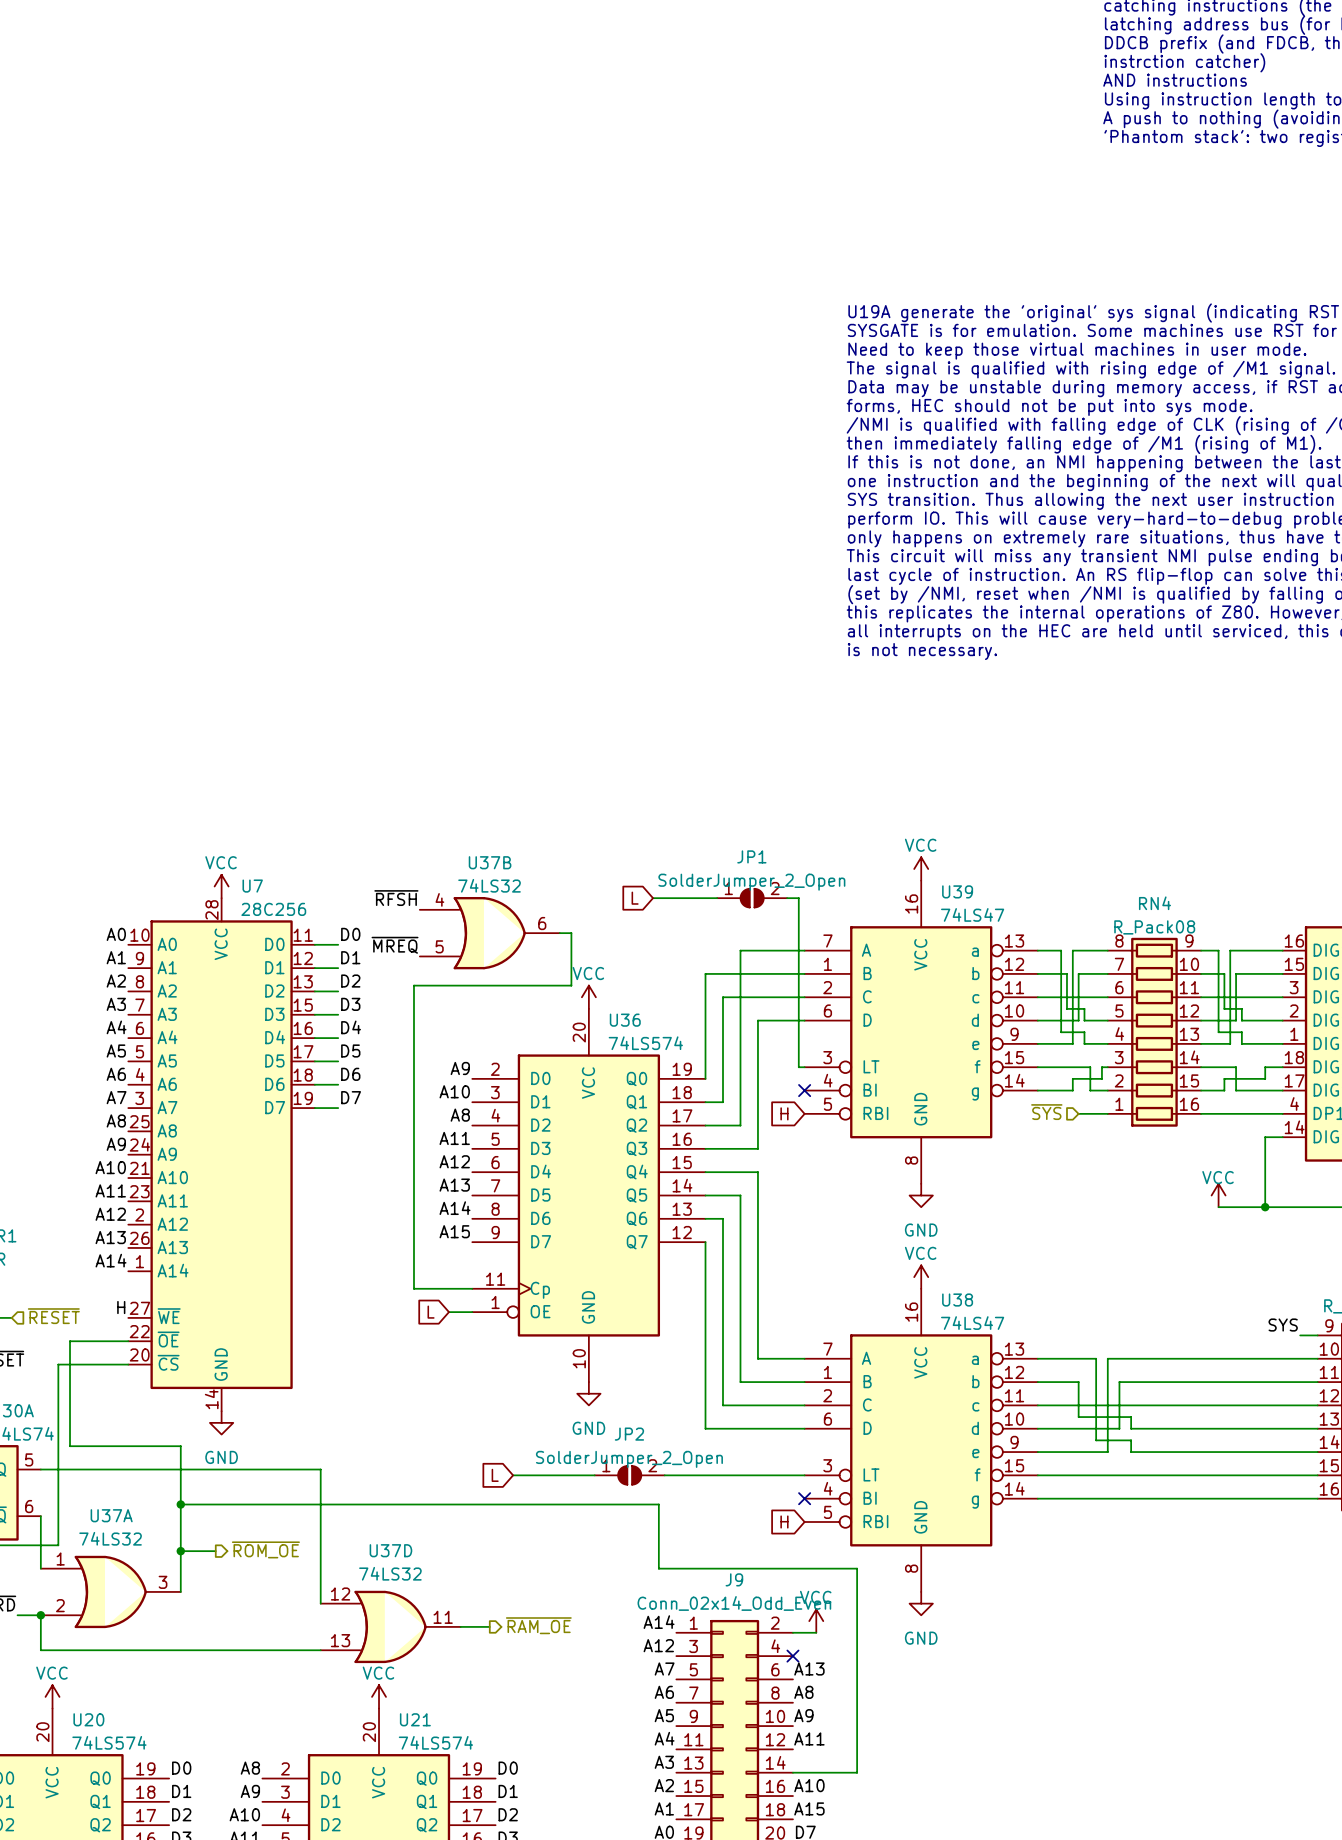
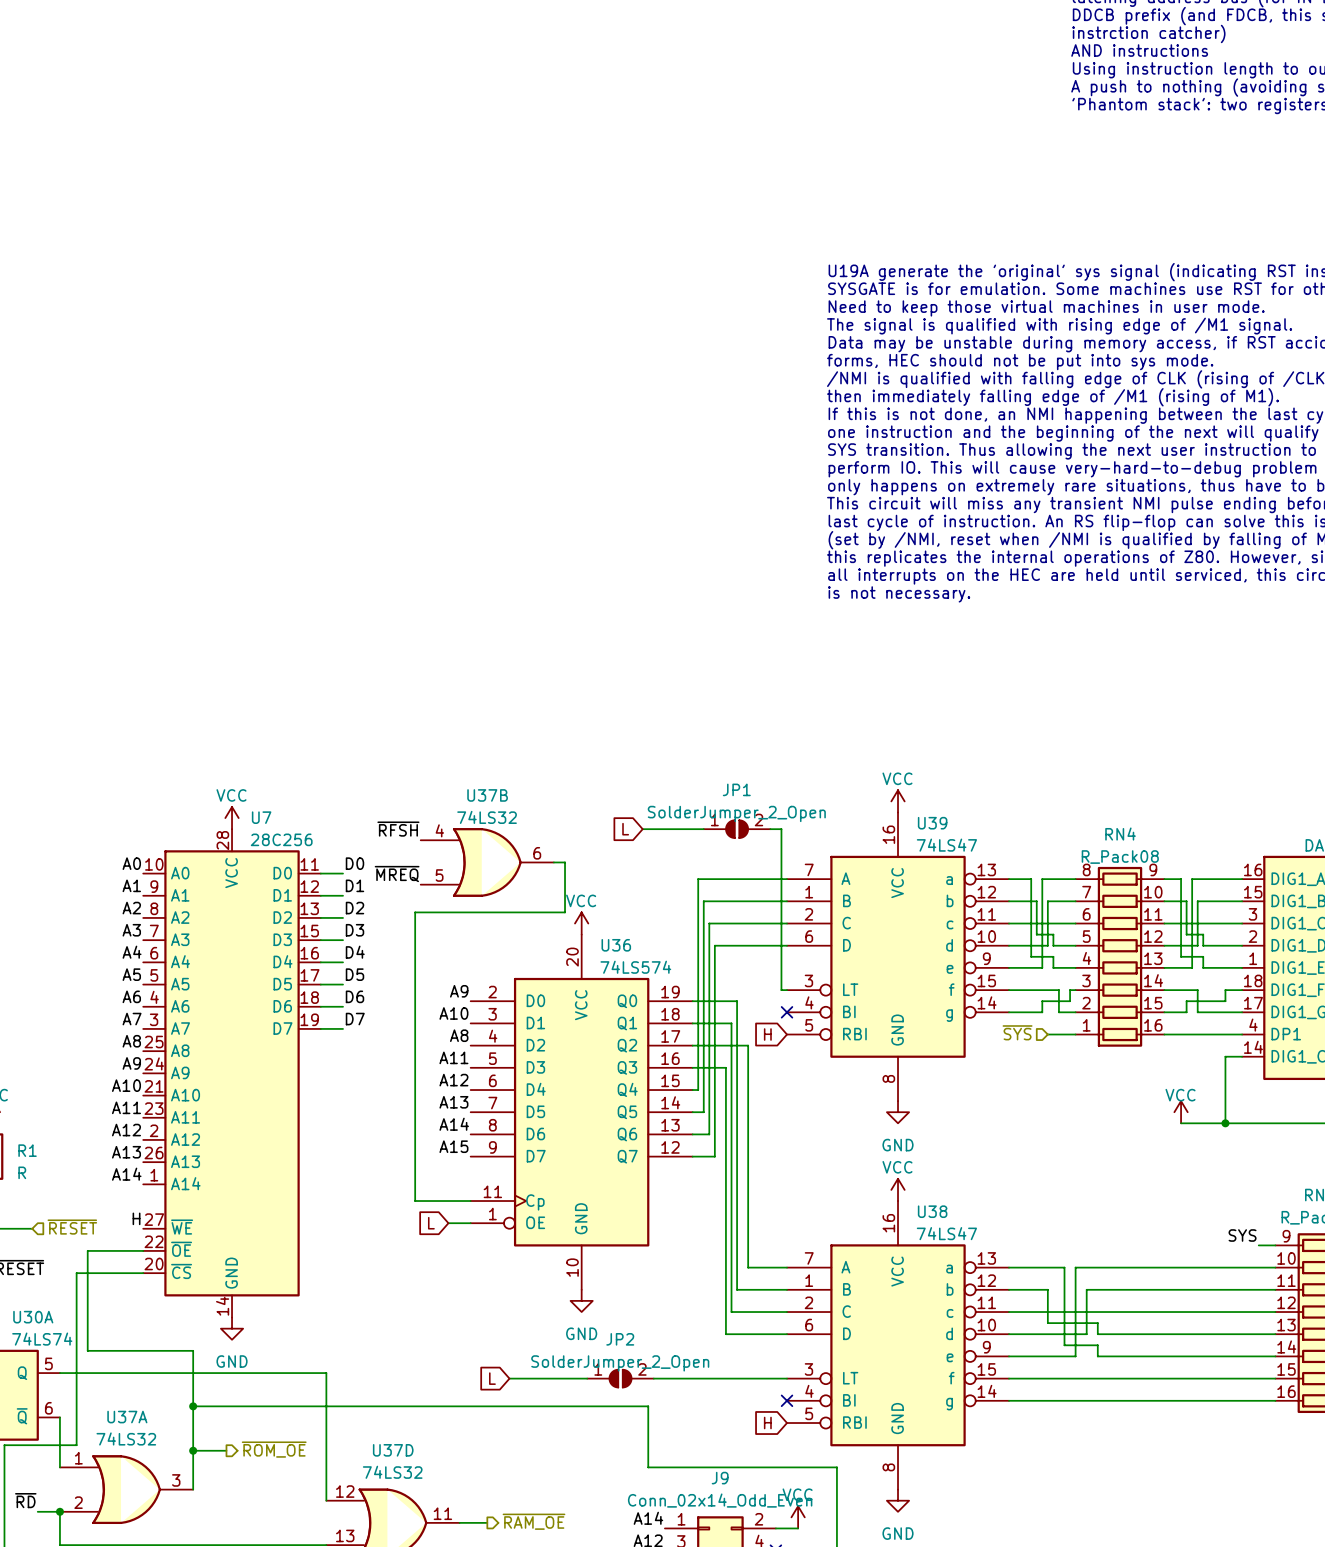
wire: (740, 950) (740, 1125) -> (725, 879) (698, 879) (698, 1090)
wire: (717, 973) (705, 973) (705, 1078) -> (703, 901) (703, 1112)
wire: (757, 1020) (757, 1148) (740, 1148) -> (742, 945) (714, 945) (714, 1156) (692, 1156)
wire: none -> (692, 1001) (737, 1001) (737, 1289)
wire: (711, 1172) (757, 1172) (757, 1358) (763, 1358) -> (725, 1045) (748, 1045) (748, 1267)
wire: (717, 1195) (740, 1195) -> (725, 1067) (725, 1112)
wire: (722, 1218) (722, 1405) (746, 1405) -> (709, 1134) (709, 1023) (731, 1023) (731, 1312)
wire: (705, 1242) (705, 1428) (740, 1428) -> none
wire: (740, 1382) (752, 1382) -> (725, 1289) (725, 1334)

